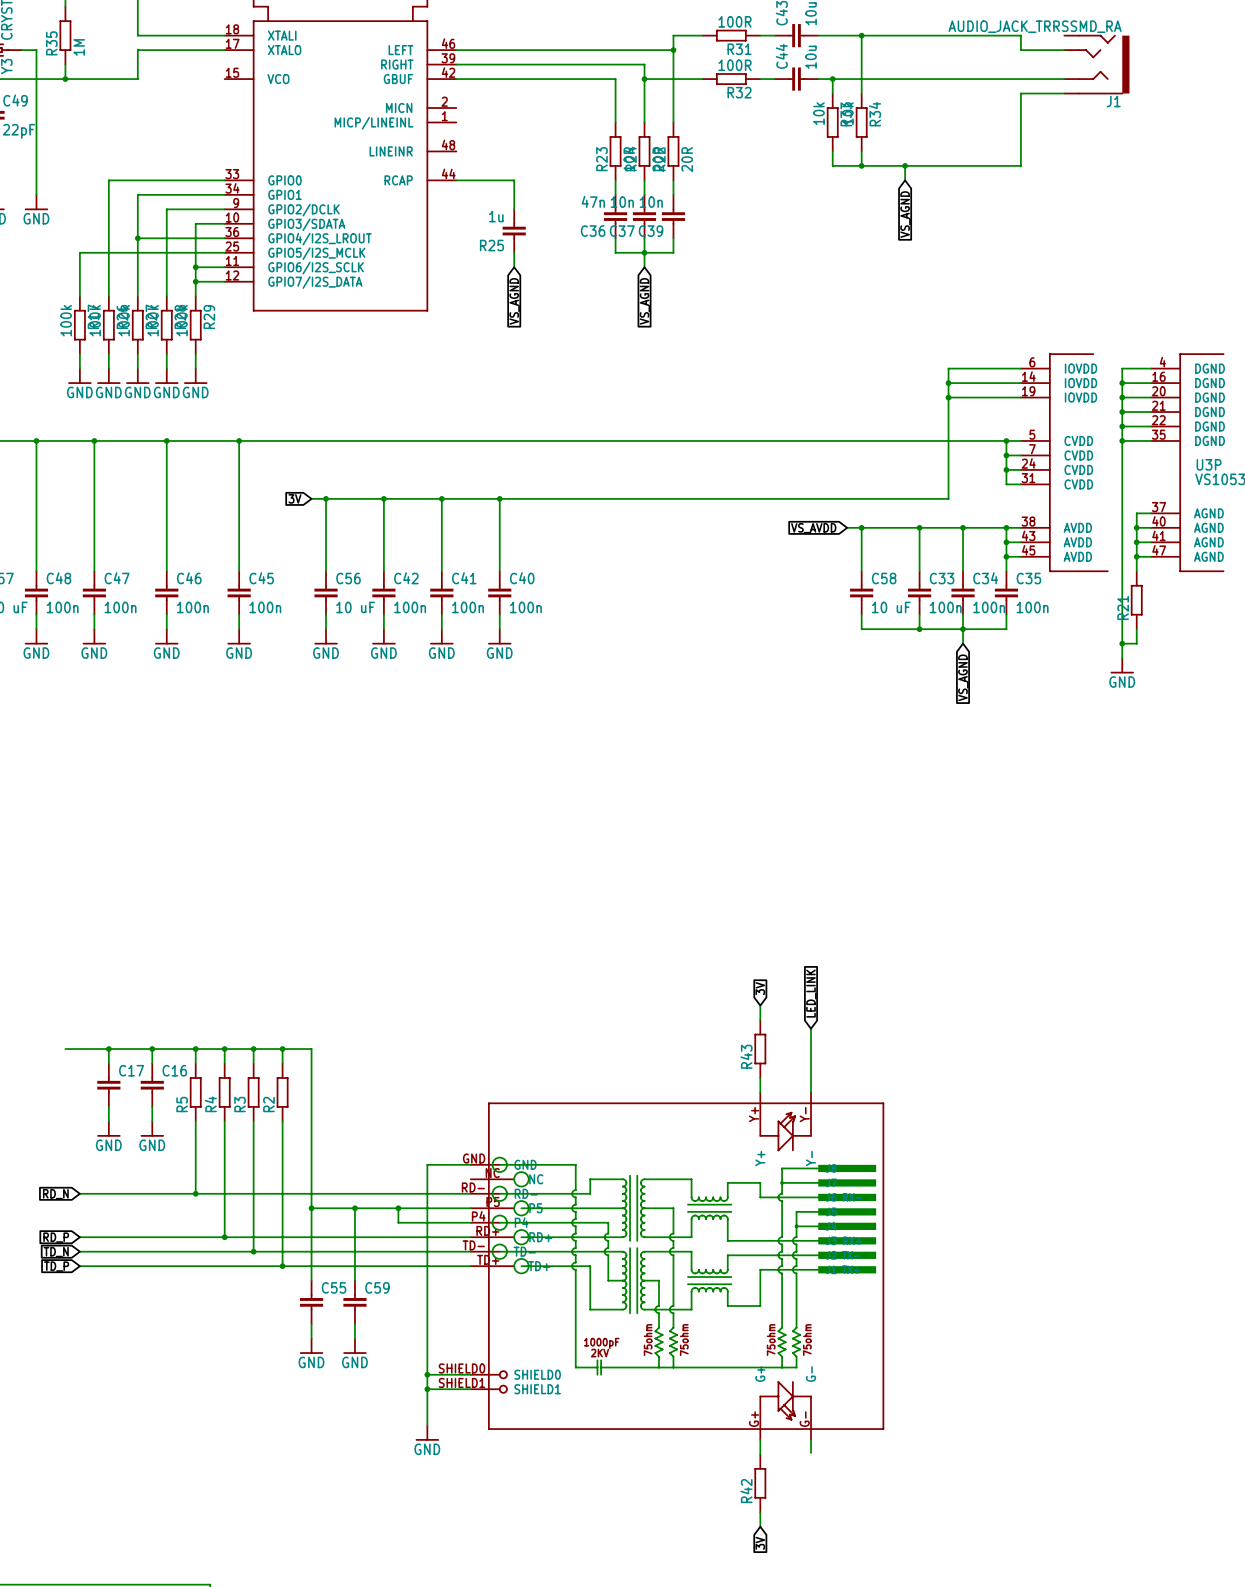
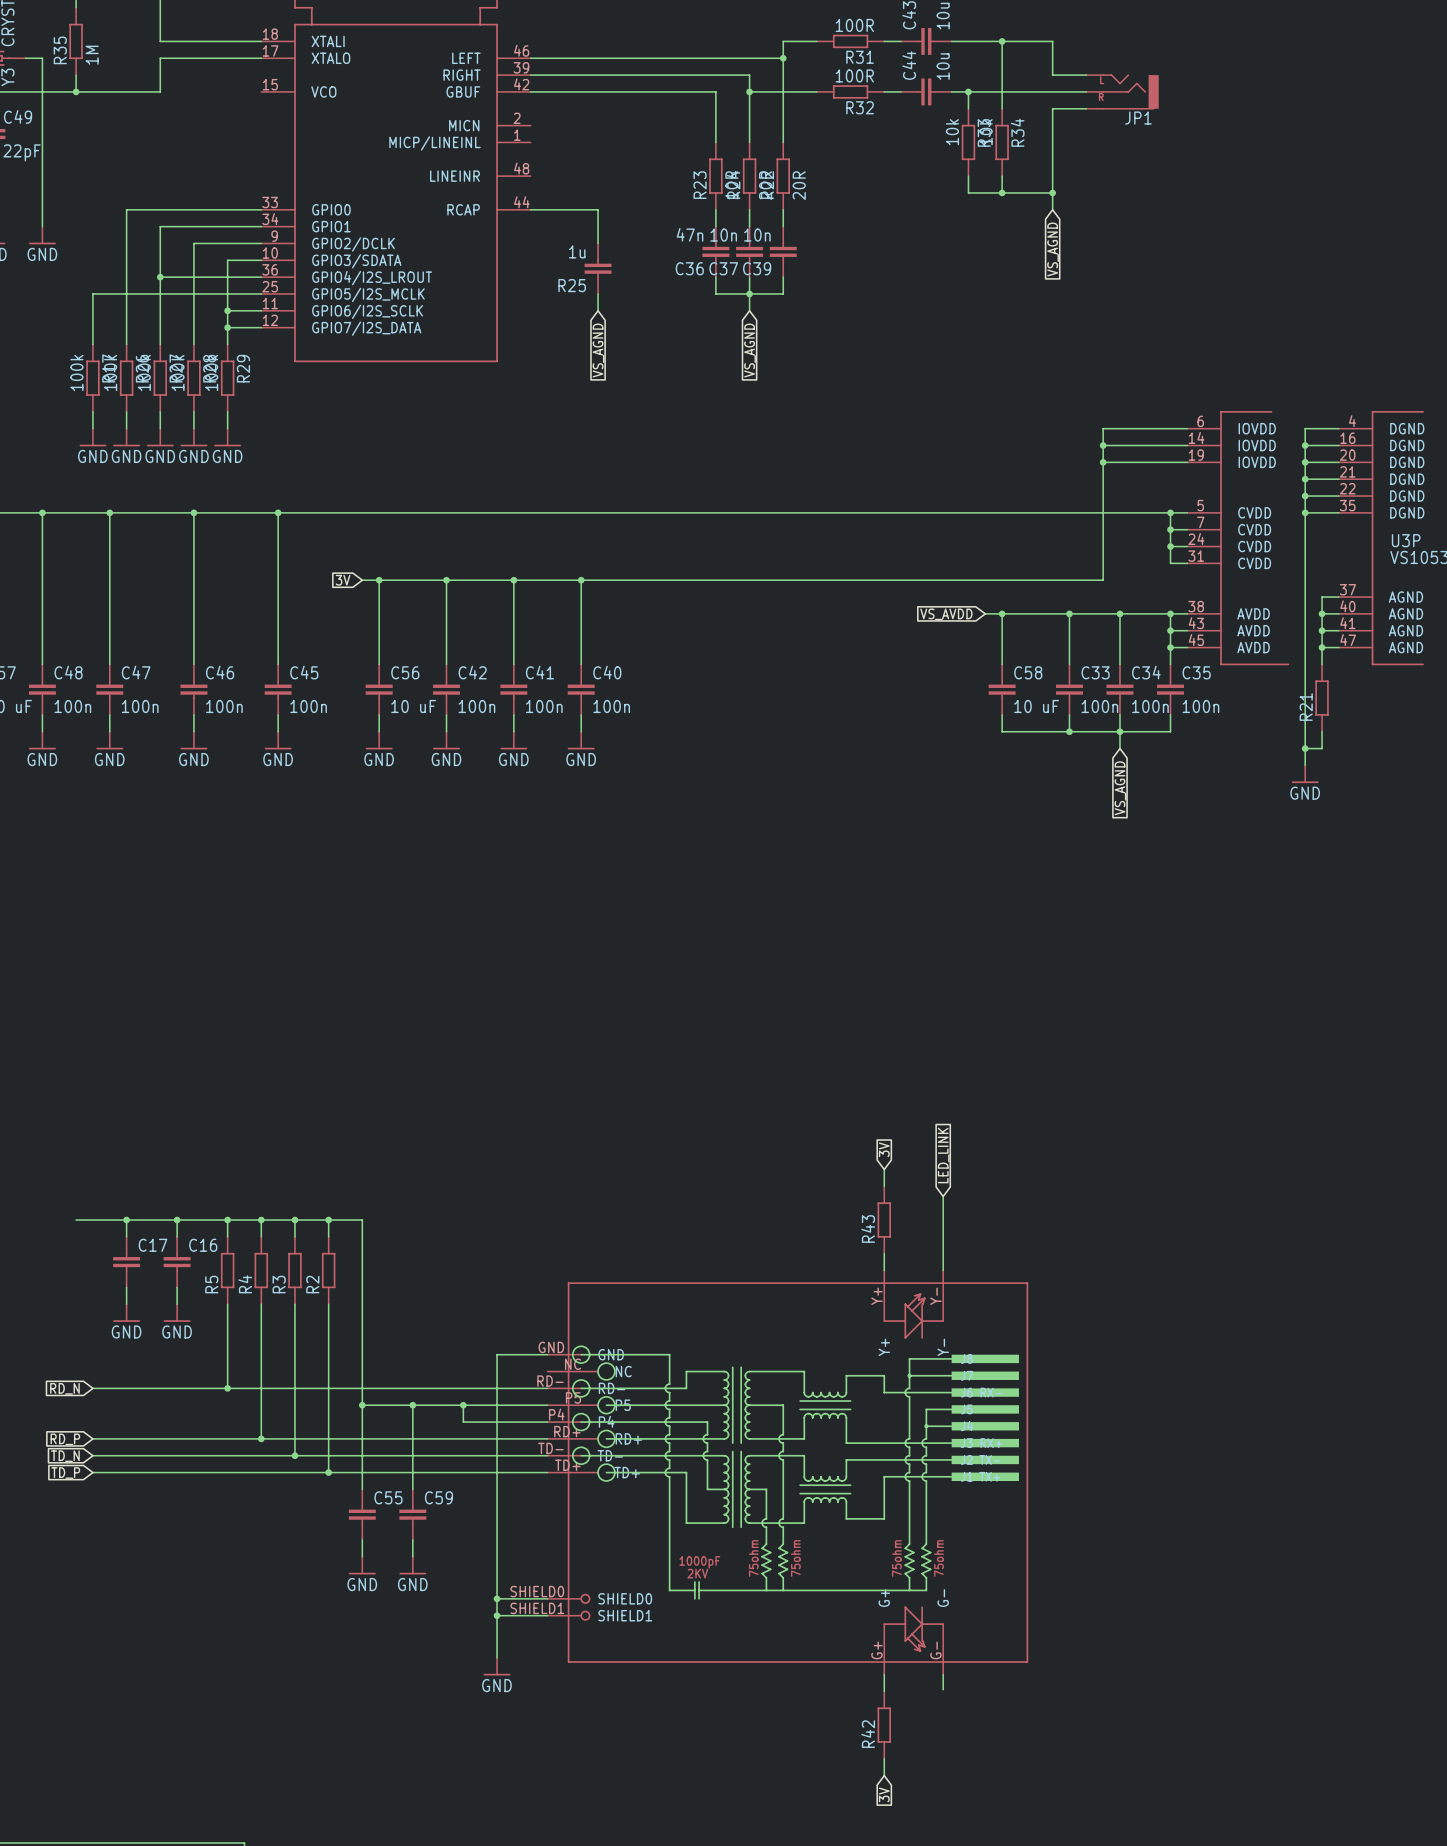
wire: (905, 35) (1020, 35) (1020, 50) (1064, 50) -> (1052, 41) (1052, 75) (1086, 75)
J1: AUDIO_JACK_TRRSSMD_RA (1096, 64) -> none
wire: (934, 79) (1064, 79) -> none
JP1: none -> (1122, 91)
wire: (1064, 93) (1020, 93) (1020, 165) (905, 165) -> (1086, 108) (1052, 108) (1052, 192)

